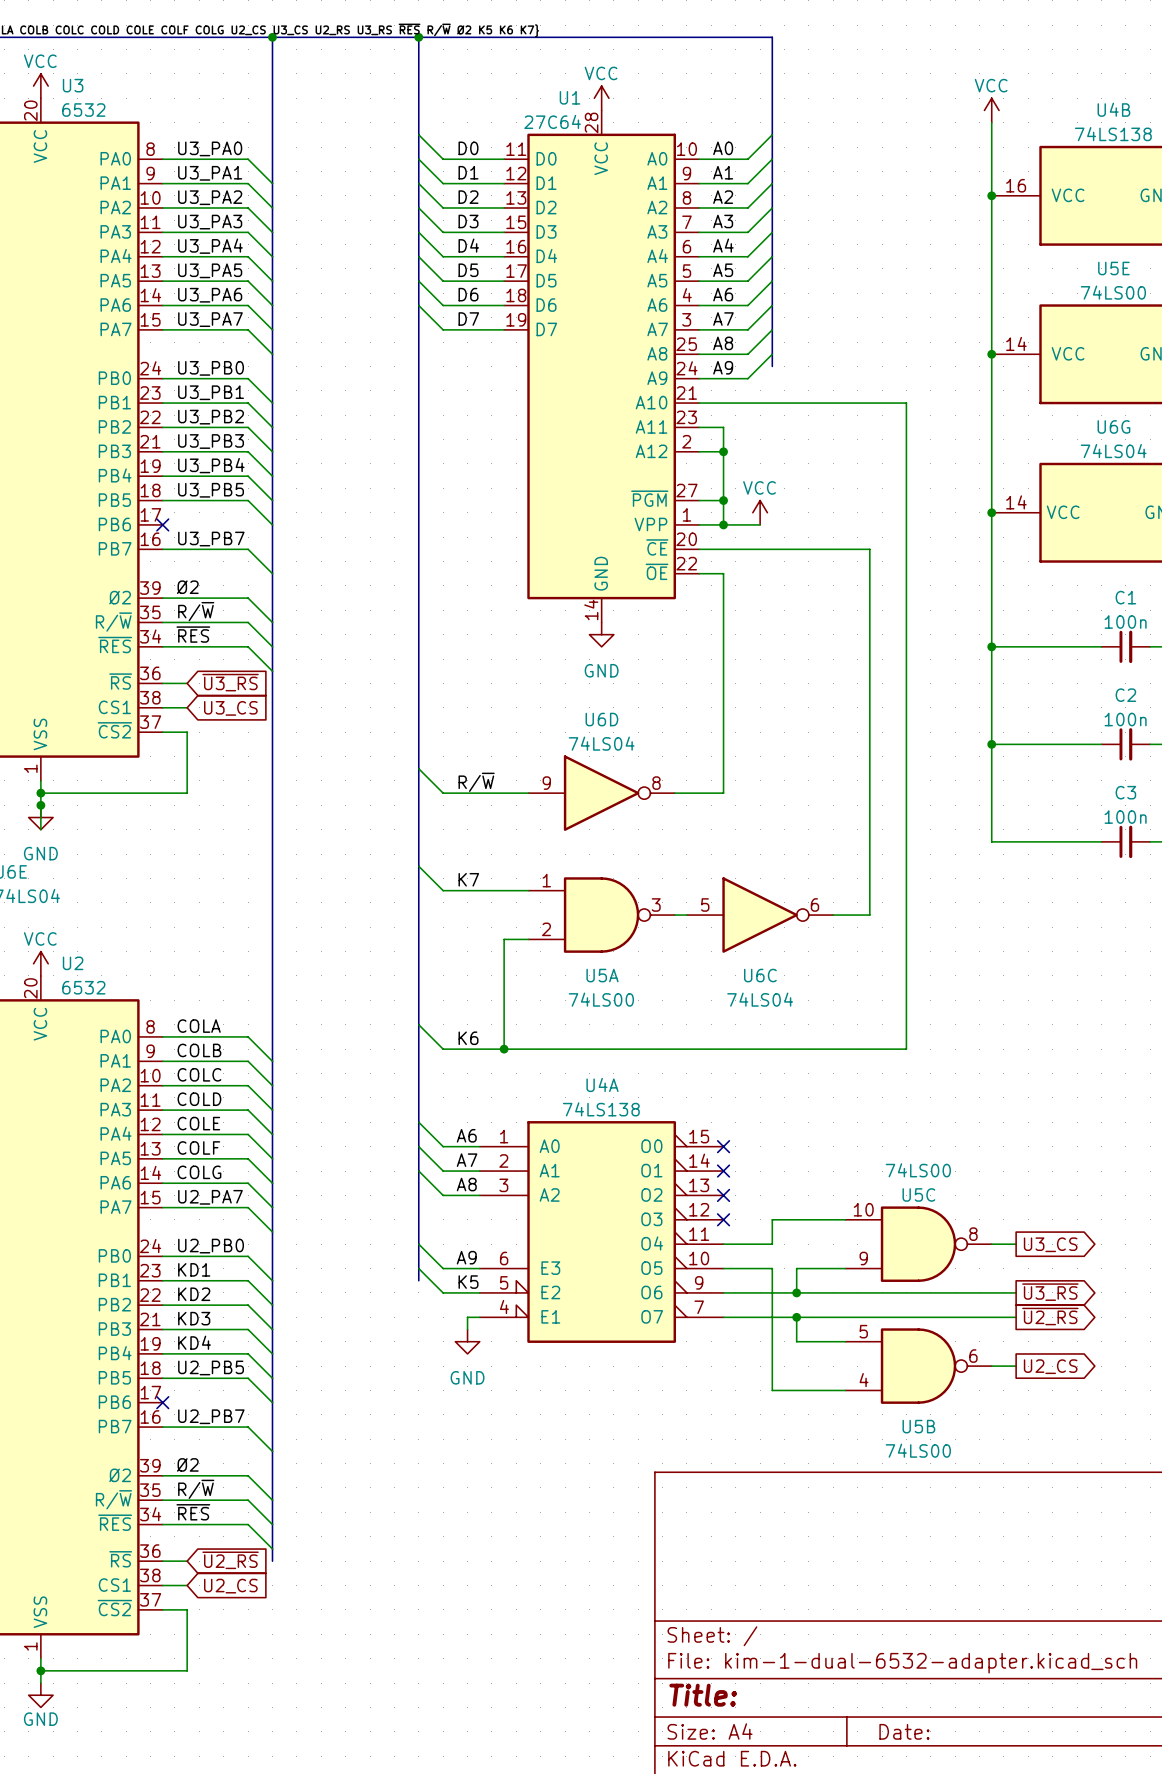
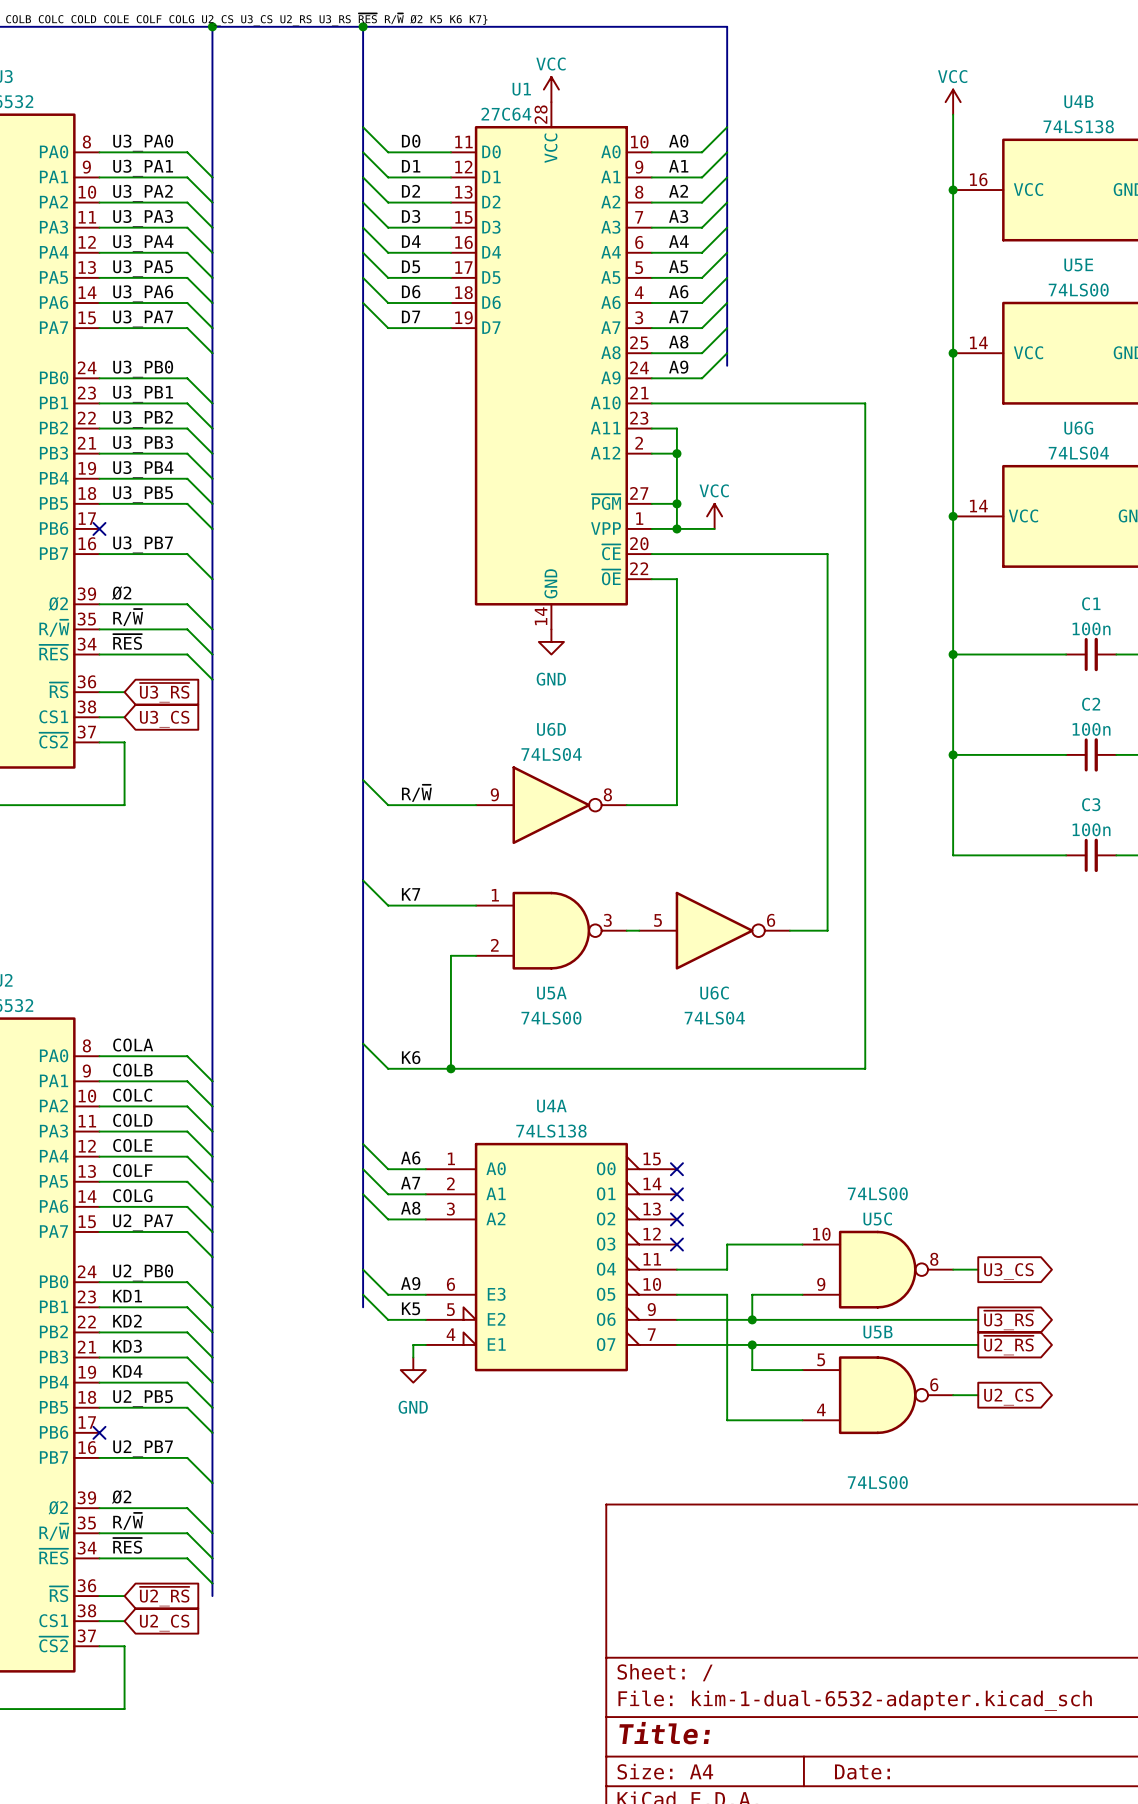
U5B name position: U5B (918, 1426) -> U5B (878, 1332)

